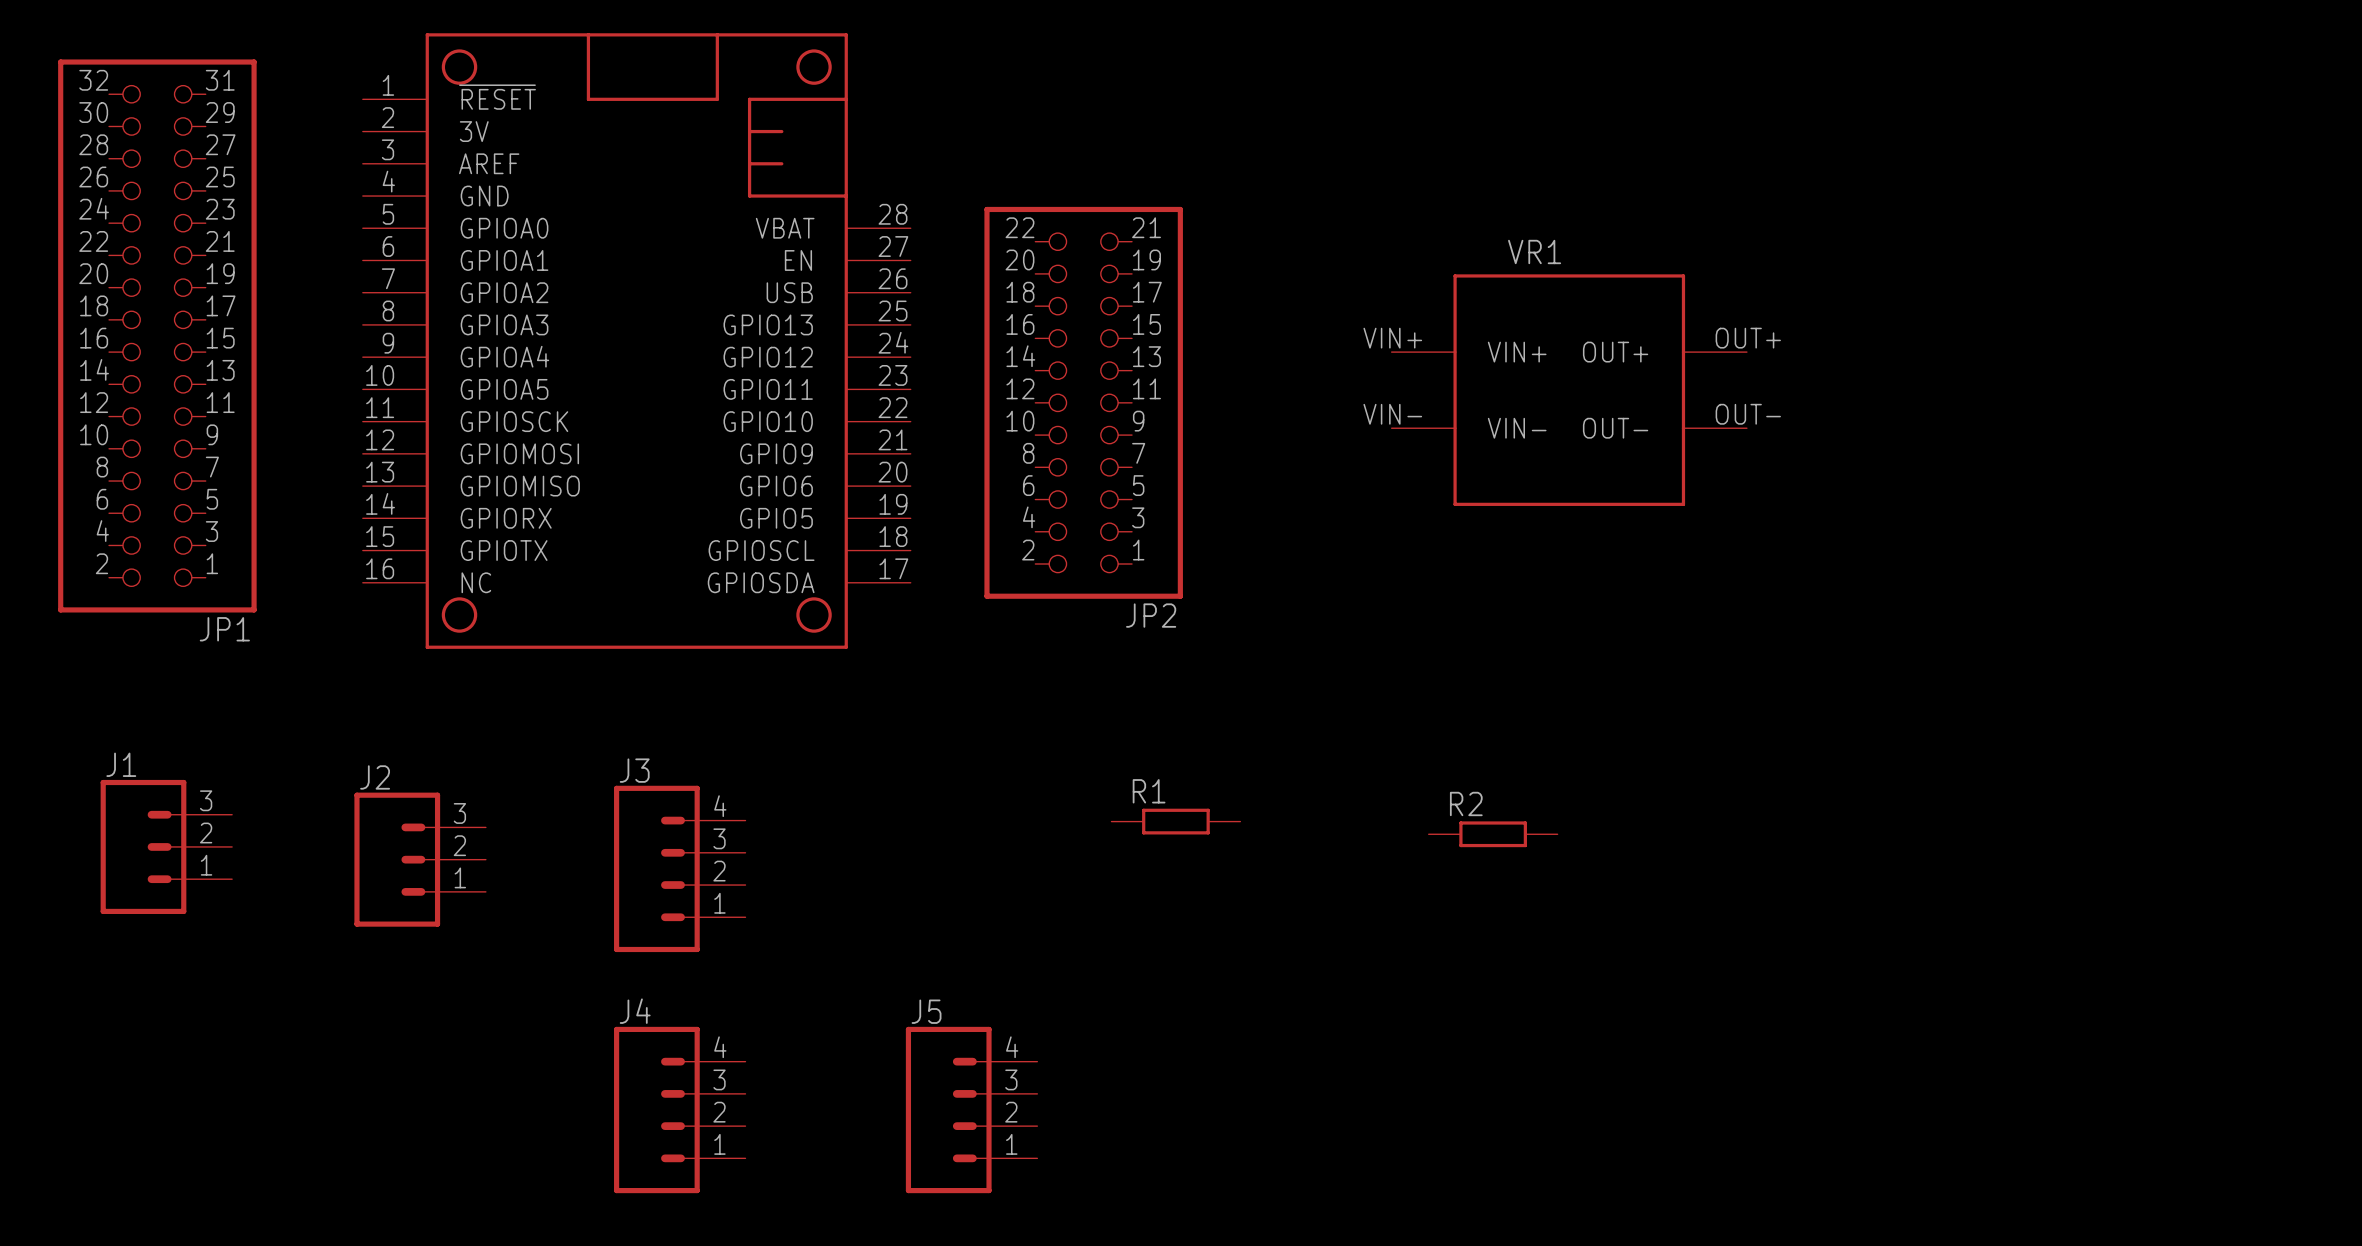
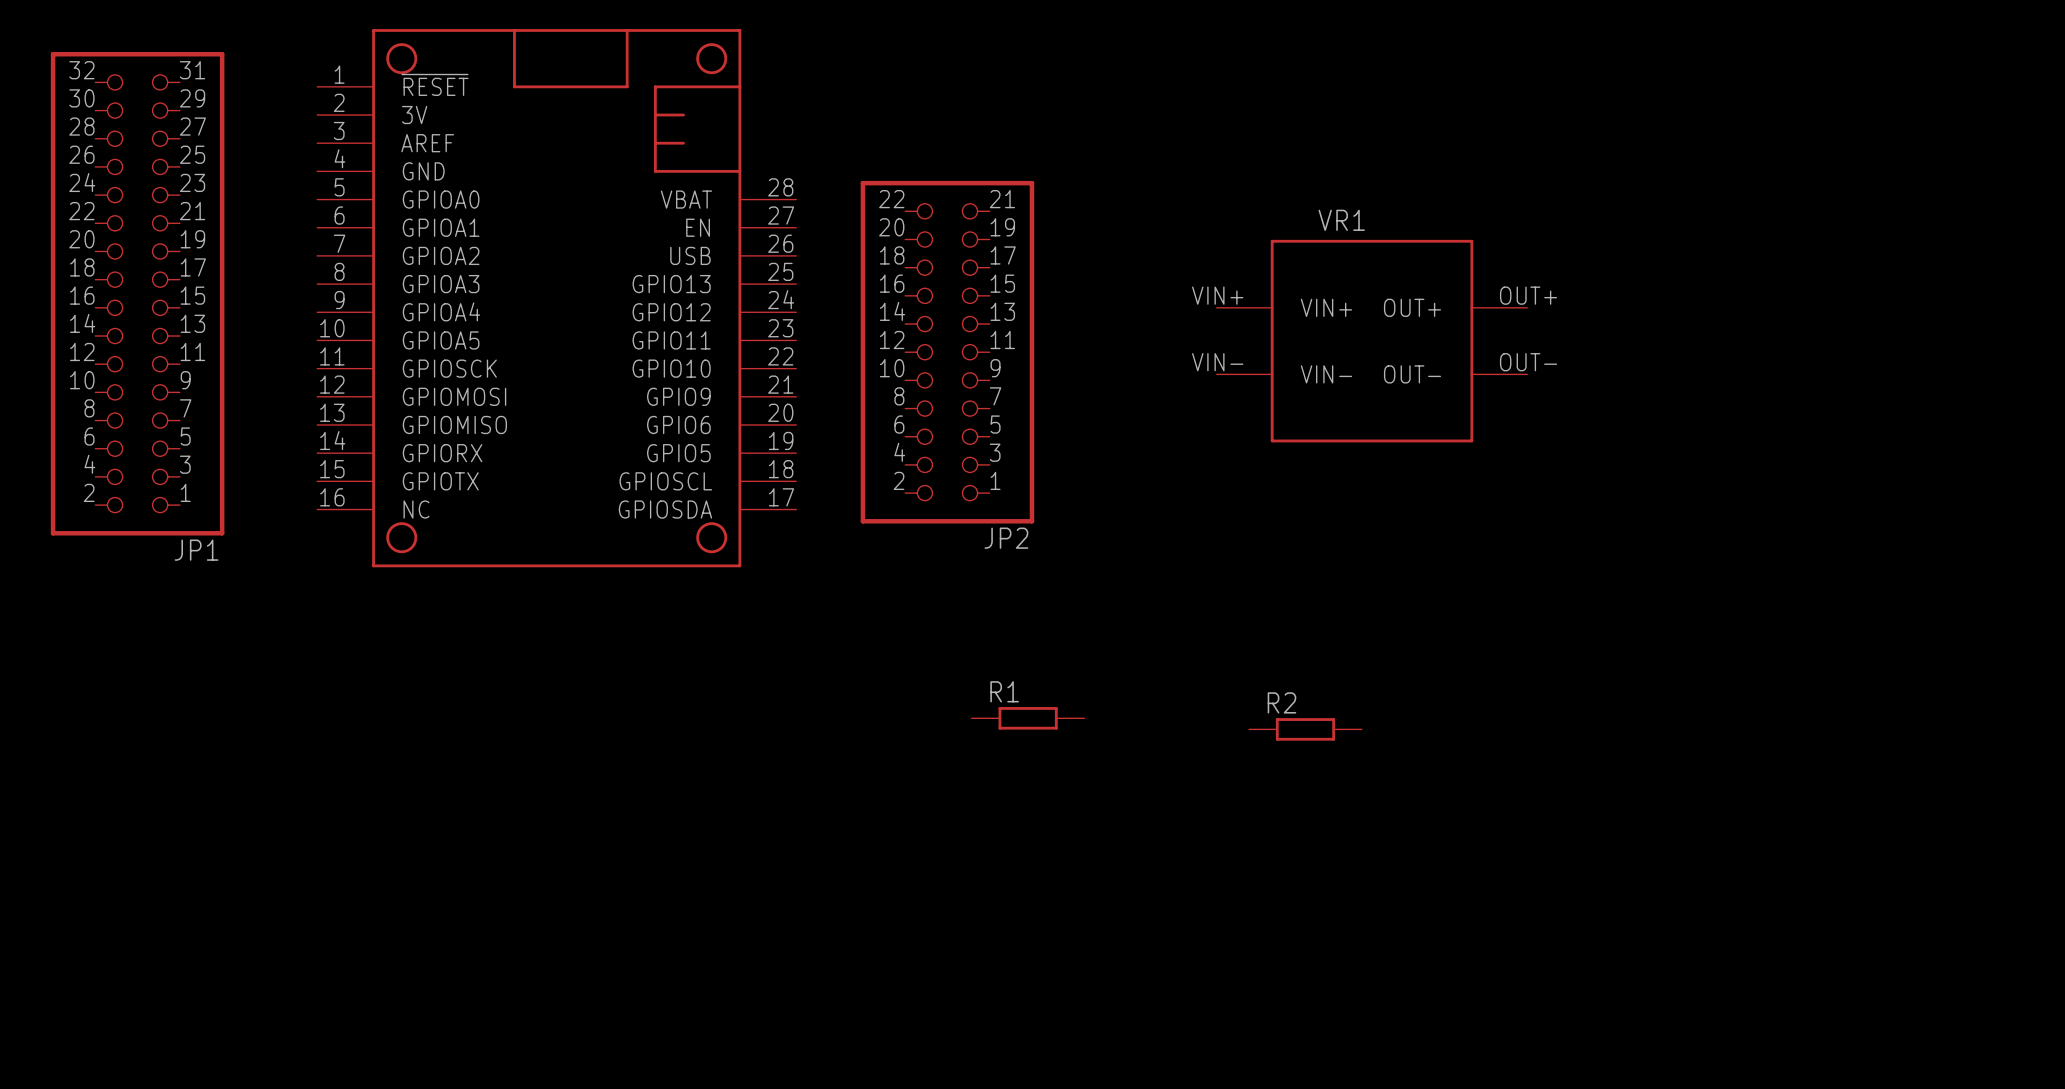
J1: (166, 846) -> none
J2: (420, 859) -> none
J3: (679, 868) -> none
J4: (679, 1110) -> none
J5: (971, 1110) -> none

